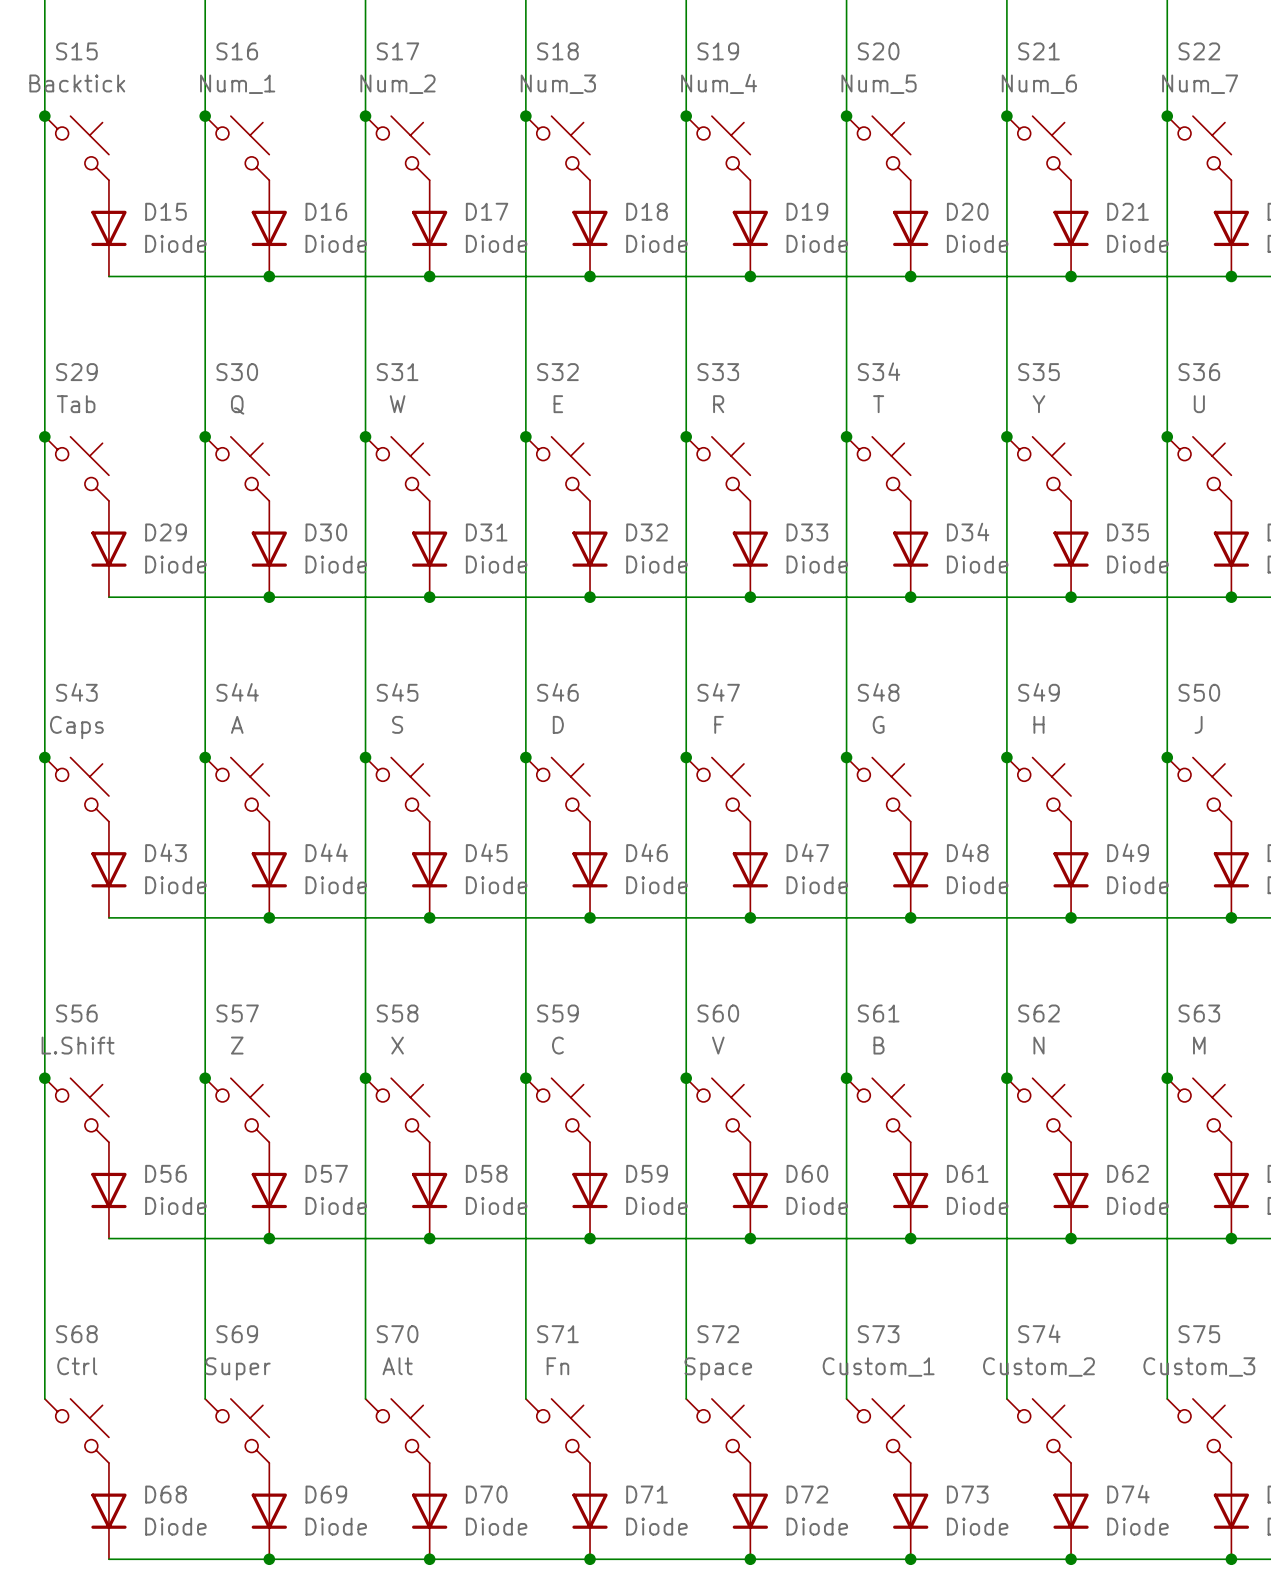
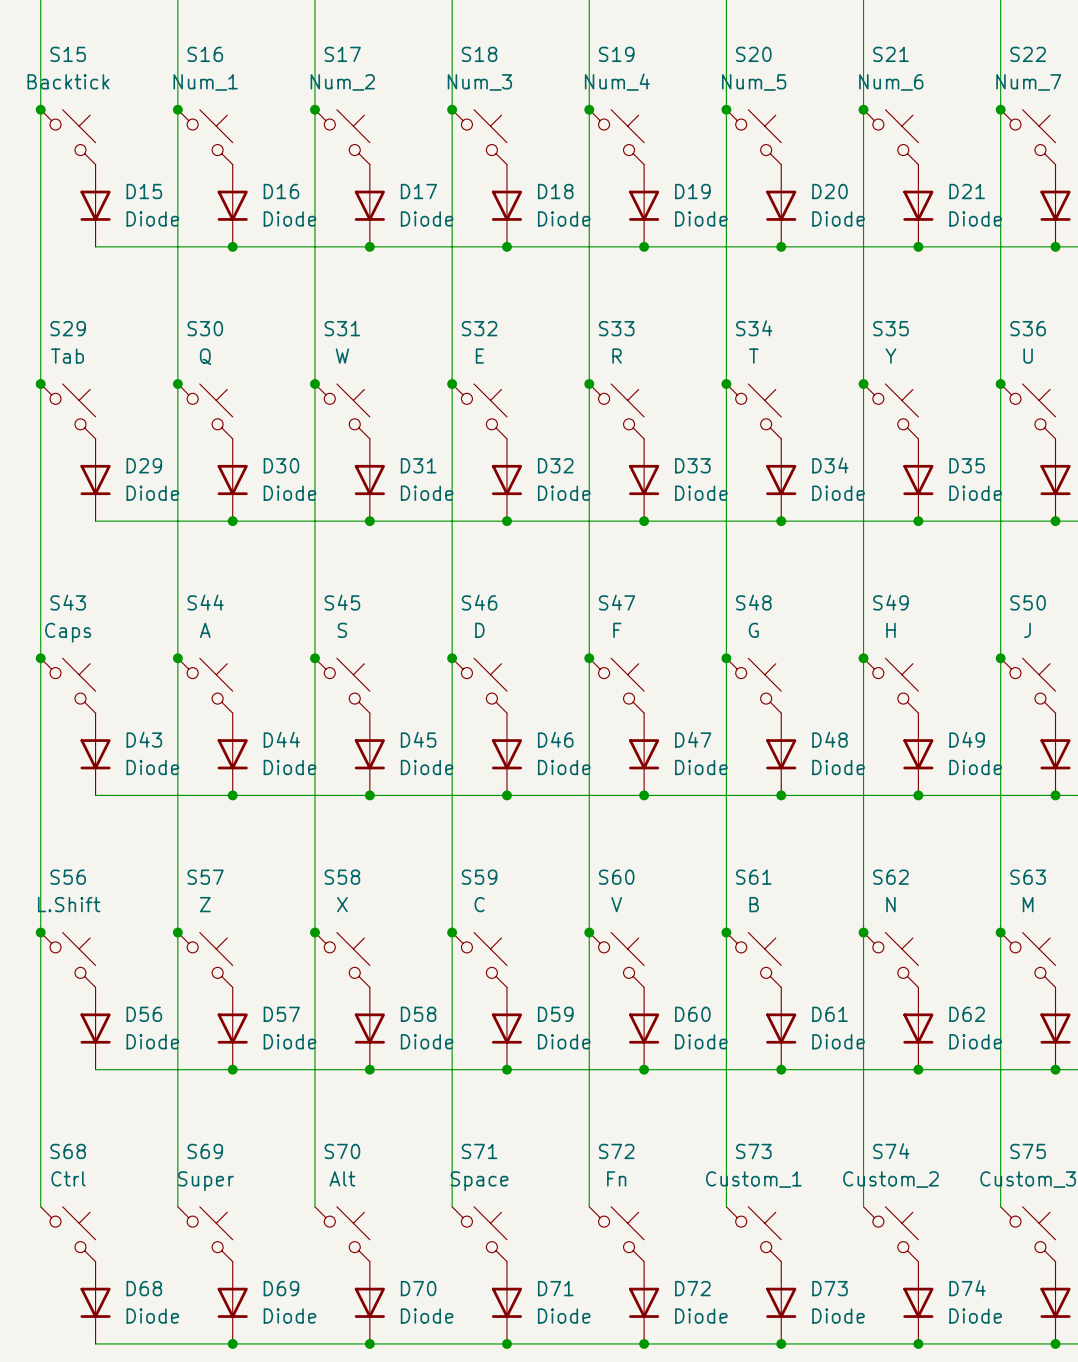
S71 value: Fn (557, 1366) -> Space (479, 1181)
S72 value: Space (718, 1368) -> Fn (616, 1178)

